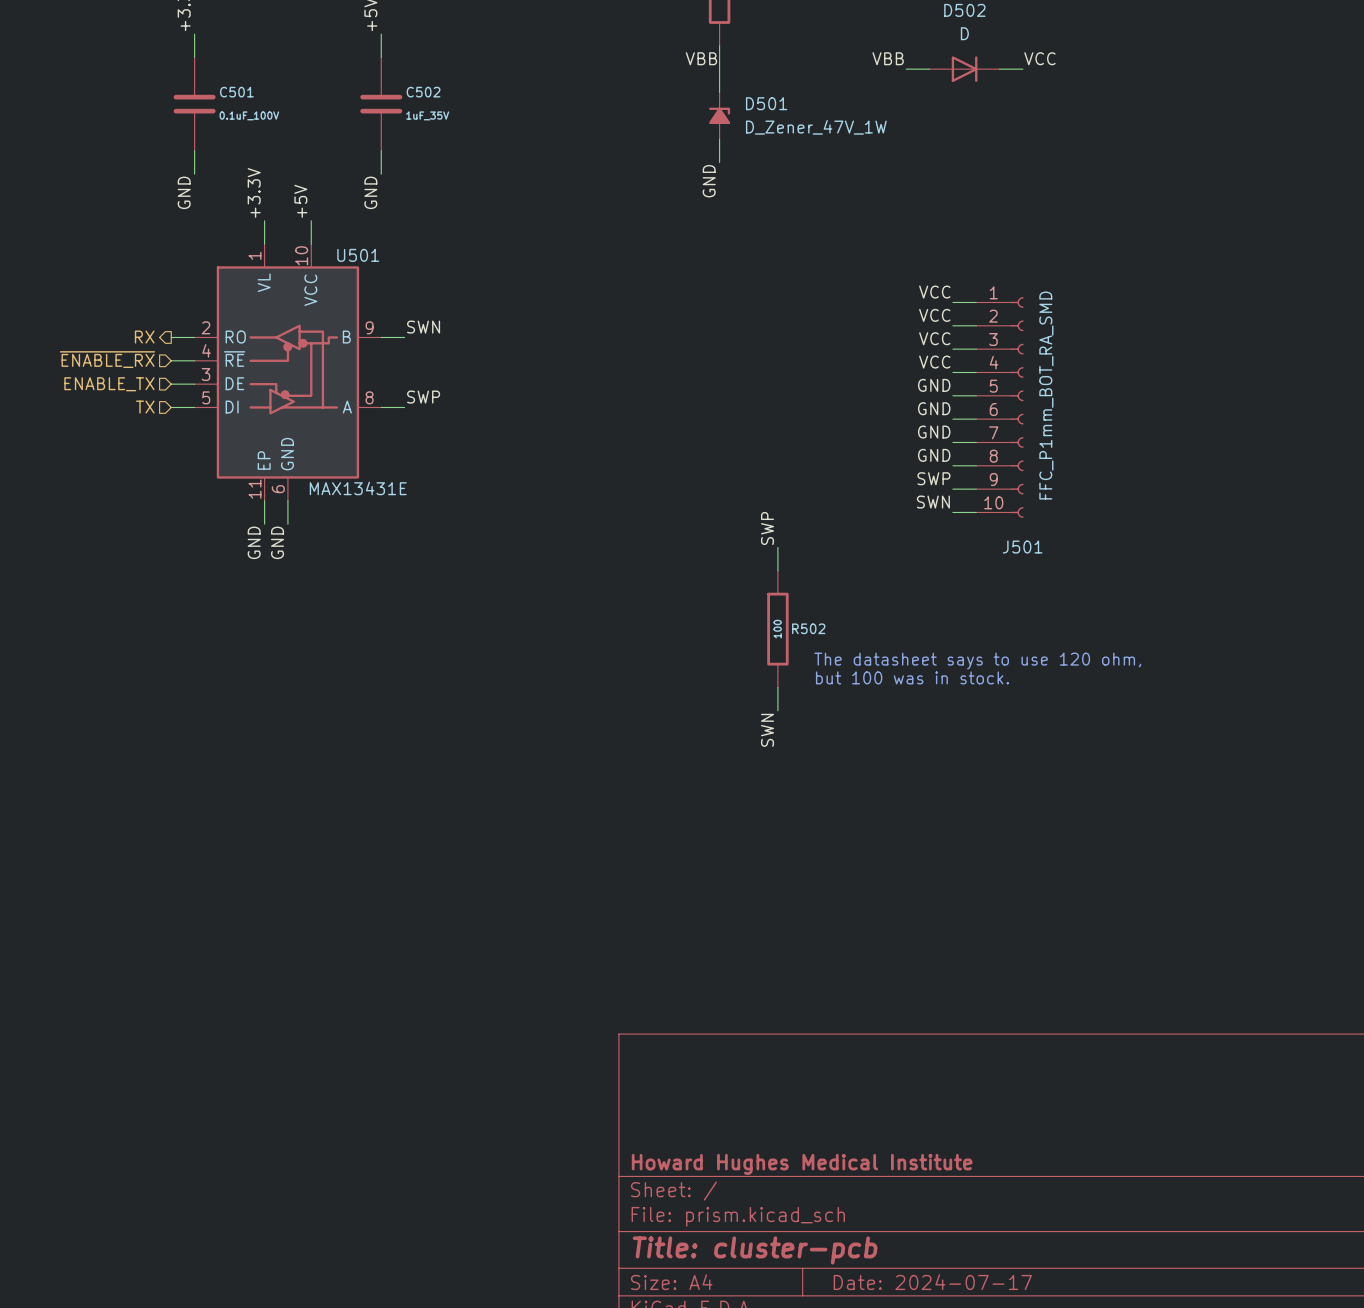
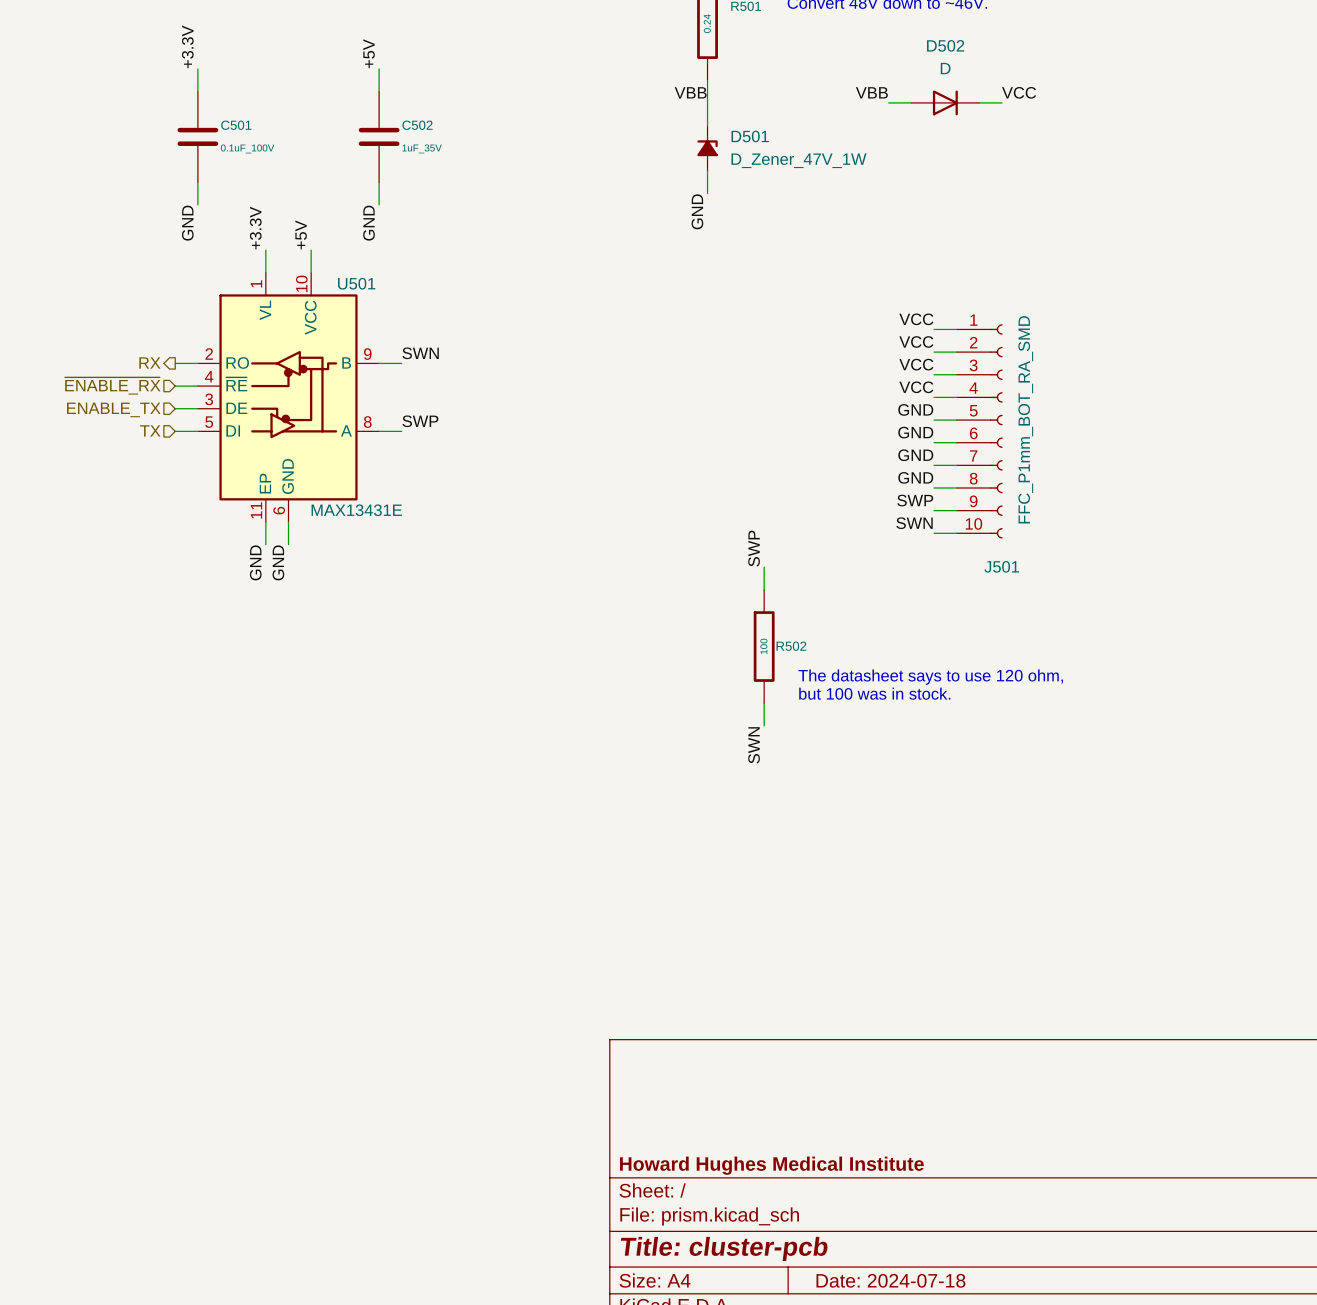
title block: Date: 2024-07-17 (932, 1282) -> Date: 2024-07-18 (890, 1280)

